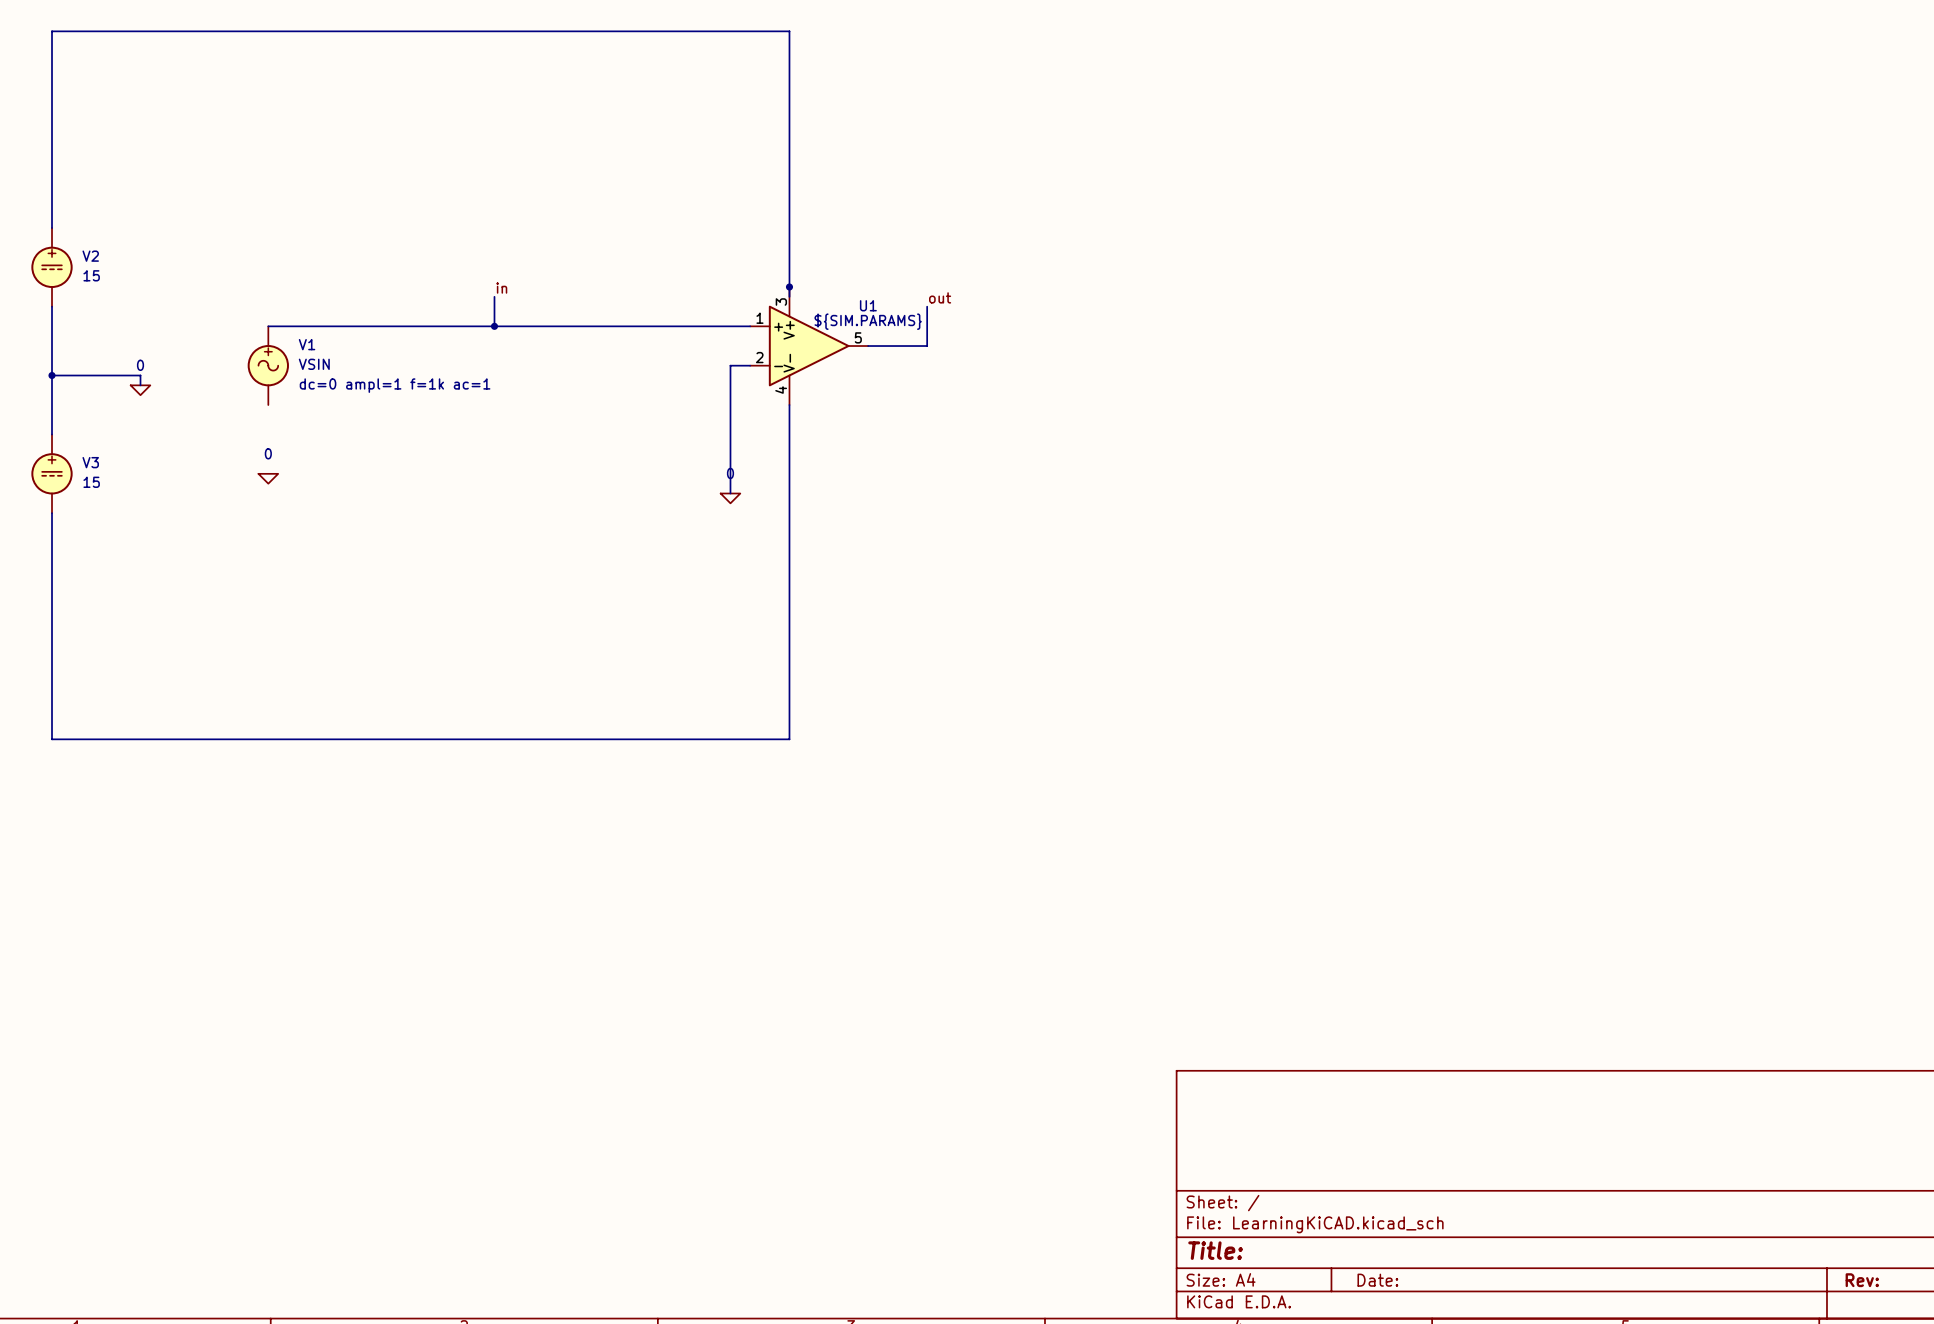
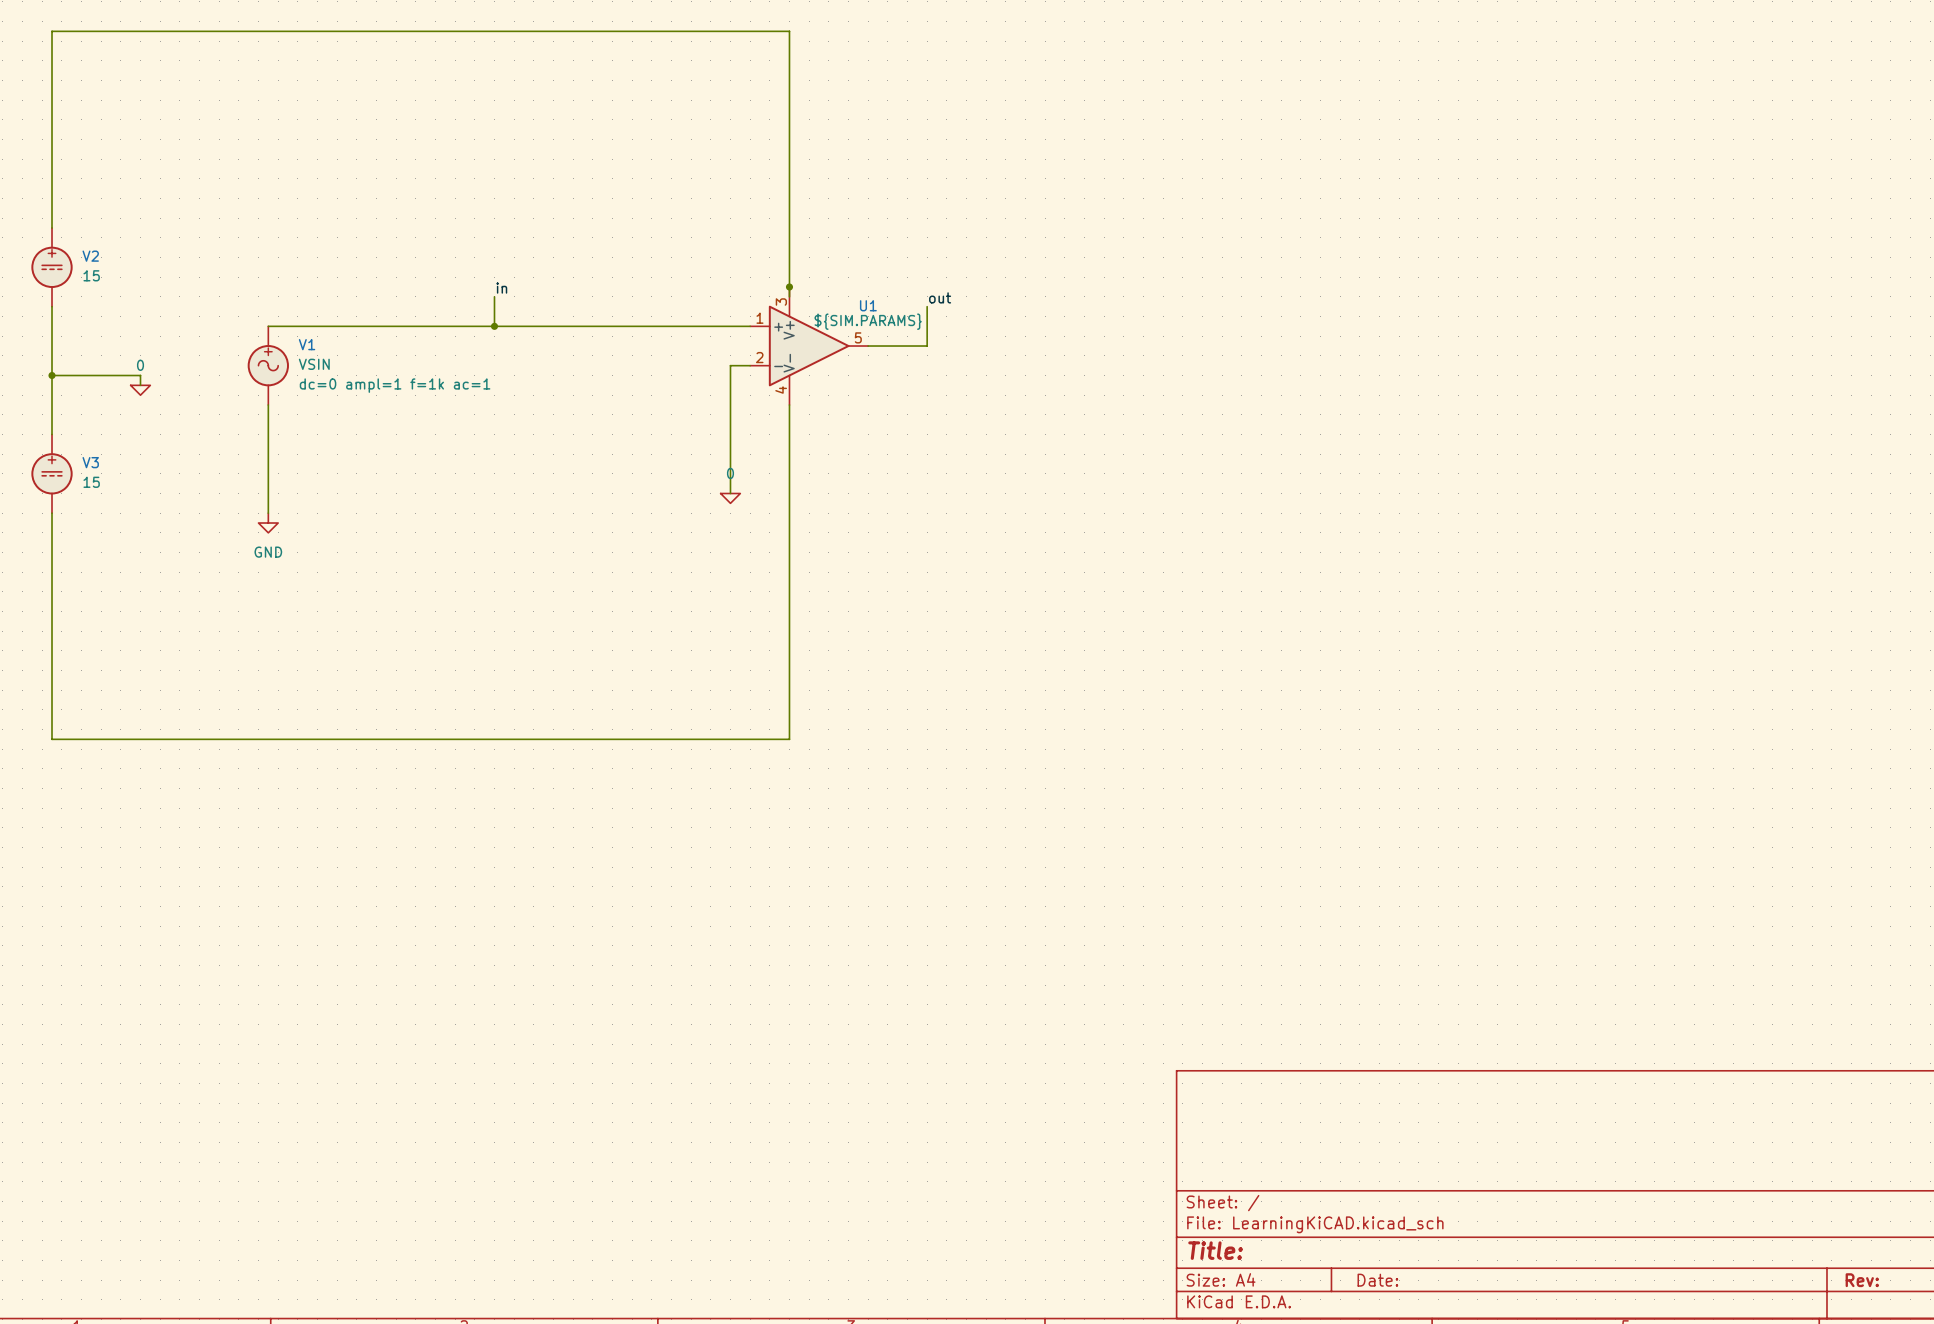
wire: none -> (268, 405) (268, 513)
power symbol: 0 (268, 478) -> none
power symbol: none -> GND (268, 523)

